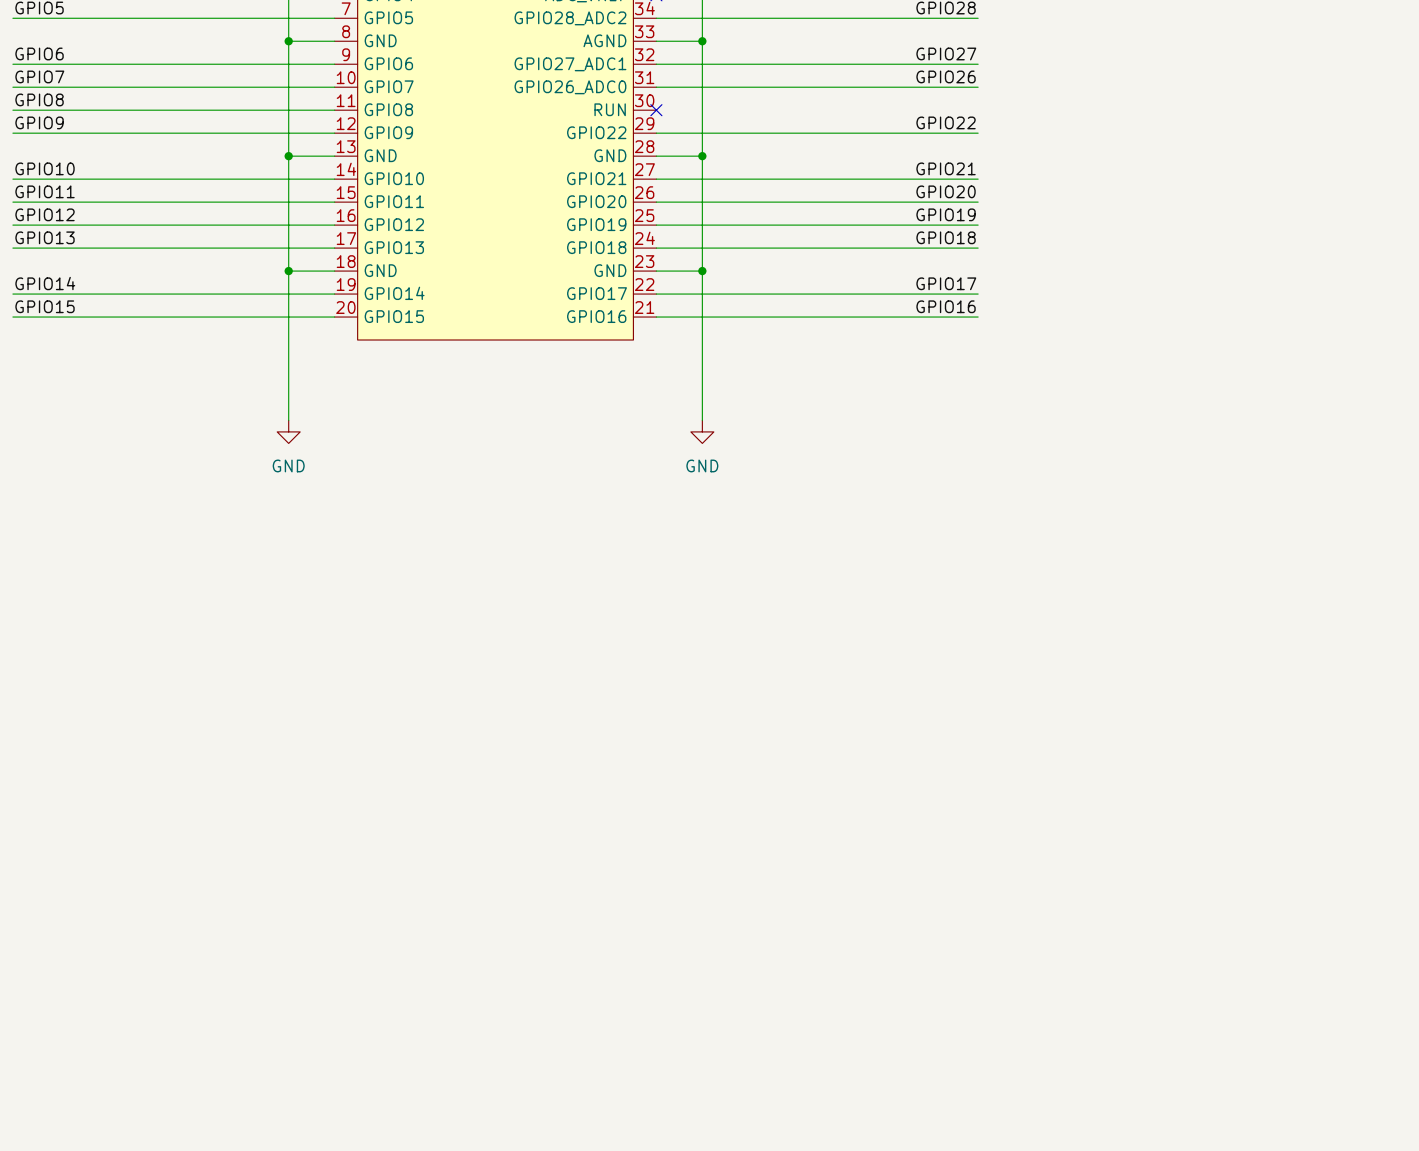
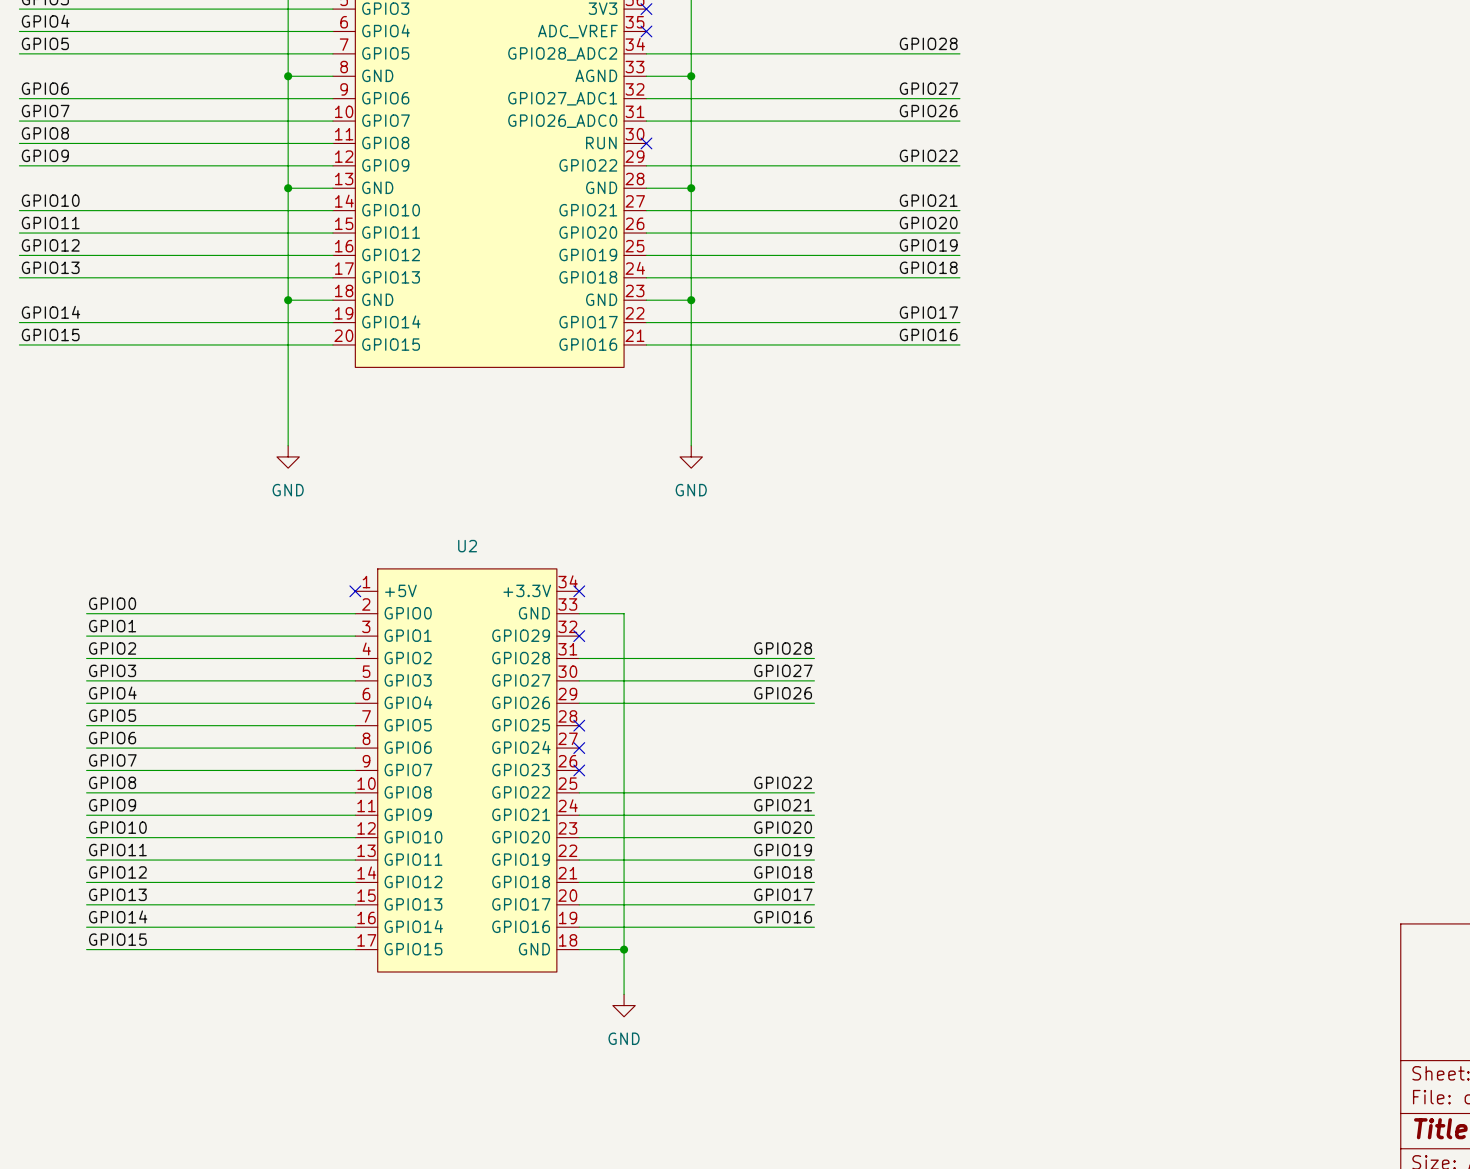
no-connect mark: none -> (355, 591)
no-connect mark: none -> (579, 591)
label: none -> GPIO0 (112, 603)
wire: none -> (86, 613) (355, 613)
wire: none -> (579, 613) (624, 613) (624, 994)
label: none -> GPIO1 (112, 626)
wire: none -> (86, 636) (355, 636)
no-connect mark: none -> (579, 636)
label: none -> GPIO2 (112, 648)
label: none -> GPIO28 (783, 648)
wire: none -> (86, 658) (355, 658)
wire: none -> (579, 658) (814, 658)
label: none -> GPIO3 (112, 670)
label: none -> GPIO27 (783, 670)
wire: none -> (86, 680) (355, 680)
wire: none -> (579, 680) (814, 680)
label: none -> GPIO4 (112, 693)
label: none -> GPIO26 (783, 693)
wire: none -> (86, 703) (355, 703)
wire: none -> (579, 703) (814, 703)
label: none -> GPIO5 (112, 715)
wire: none -> (86, 725) (355, 725)
no-connect mark: none -> (579, 725)
label: none -> GPIO6 (112, 738)
wire: none -> (86, 748) (355, 748)
no-connect mark: none -> (579, 748)
label: none -> GPIO7 (112, 760)
wire: none -> (86, 770) (355, 770)
U2: none -> (467, 770)
no-connect mark: none -> (579, 770)
label: none -> GPIO8 (112, 782)
label: none -> GPIO22 (783, 782)
wire: none -> (86, 792) (355, 792)
wire: none -> (579, 792) (814, 792)
label: none -> GPIO9 (112, 805)
label: none -> GPIO21 (783, 805)
wire: none -> (86, 815) (355, 815)
wire: none -> (579, 815) (814, 815)
label: none -> GPIO10 (117, 827)
label: none -> GPIO20 (783, 827)
wire: none -> (86, 837) (355, 837)
wire: none -> (579, 837) (814, 837)
label: none -> GPIO11 (117, 850)
label: none -> GPIO19 (783, 850)
wire: none -> (86, 860) (355, 860)
wire: none -> (579, 860) (814, 860)
label: none -> GPIO12 (117, 872)
label: none -> GPIO18 (783, 872)
wire: none -> (86, 882) (355, 882)
wire: none -> (579, 882) (814, 882)
label: none -> GPIO13 (117, 894)
label: none -> GPIO17 (783, 894)
wire: none -> (86, 904) (355, 904)
wire: none -> (579, 904) (814, 904)
label: none -> GPIO14 (118, 916)
label: none -> GPIO16 (783, 917)
wire: none -> (86, 927) (355, 927)
wire: none -> (579, 927) (814, 927)
label: none -> GPIO15 (117, 939)
wire: none -> (86, 949) (355, 949)
wire: none -> (579, 949) (624, 949)
junction: none -> (624, 949)
power symbol: none -> GND (624, 1005)

